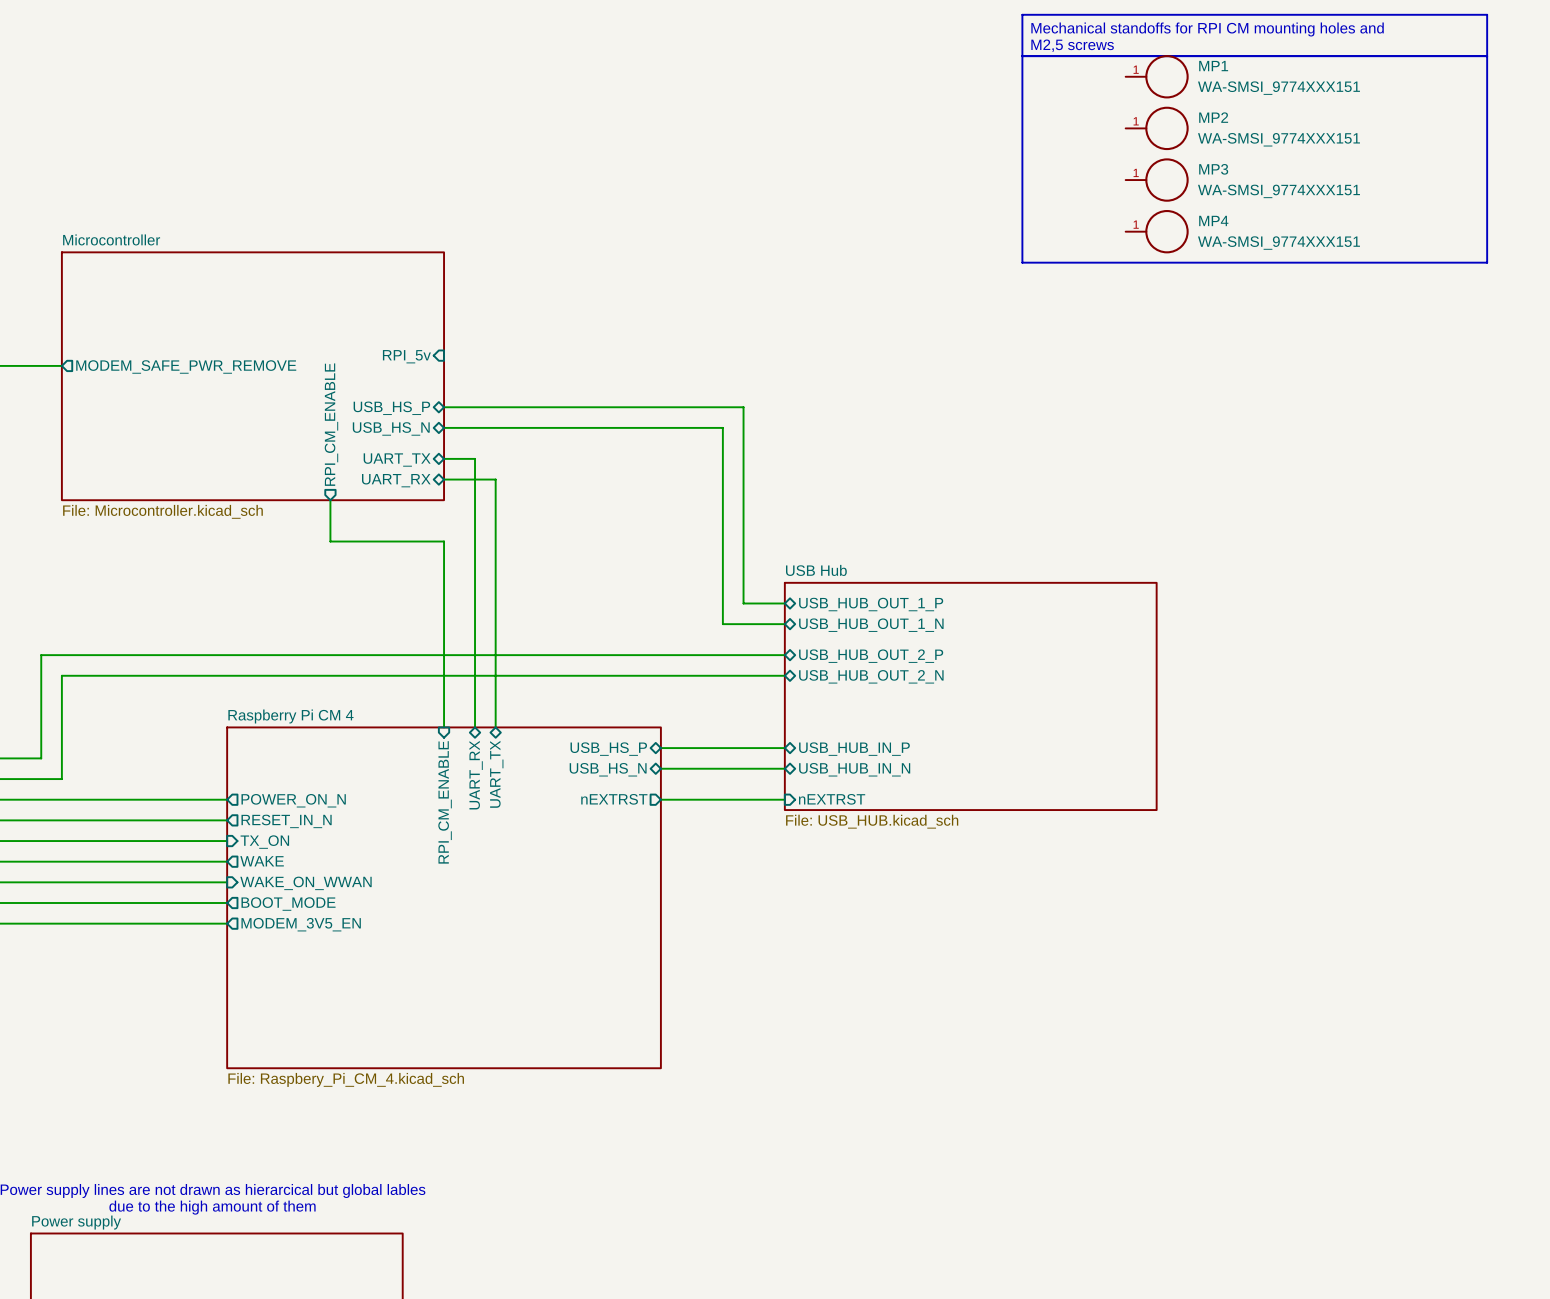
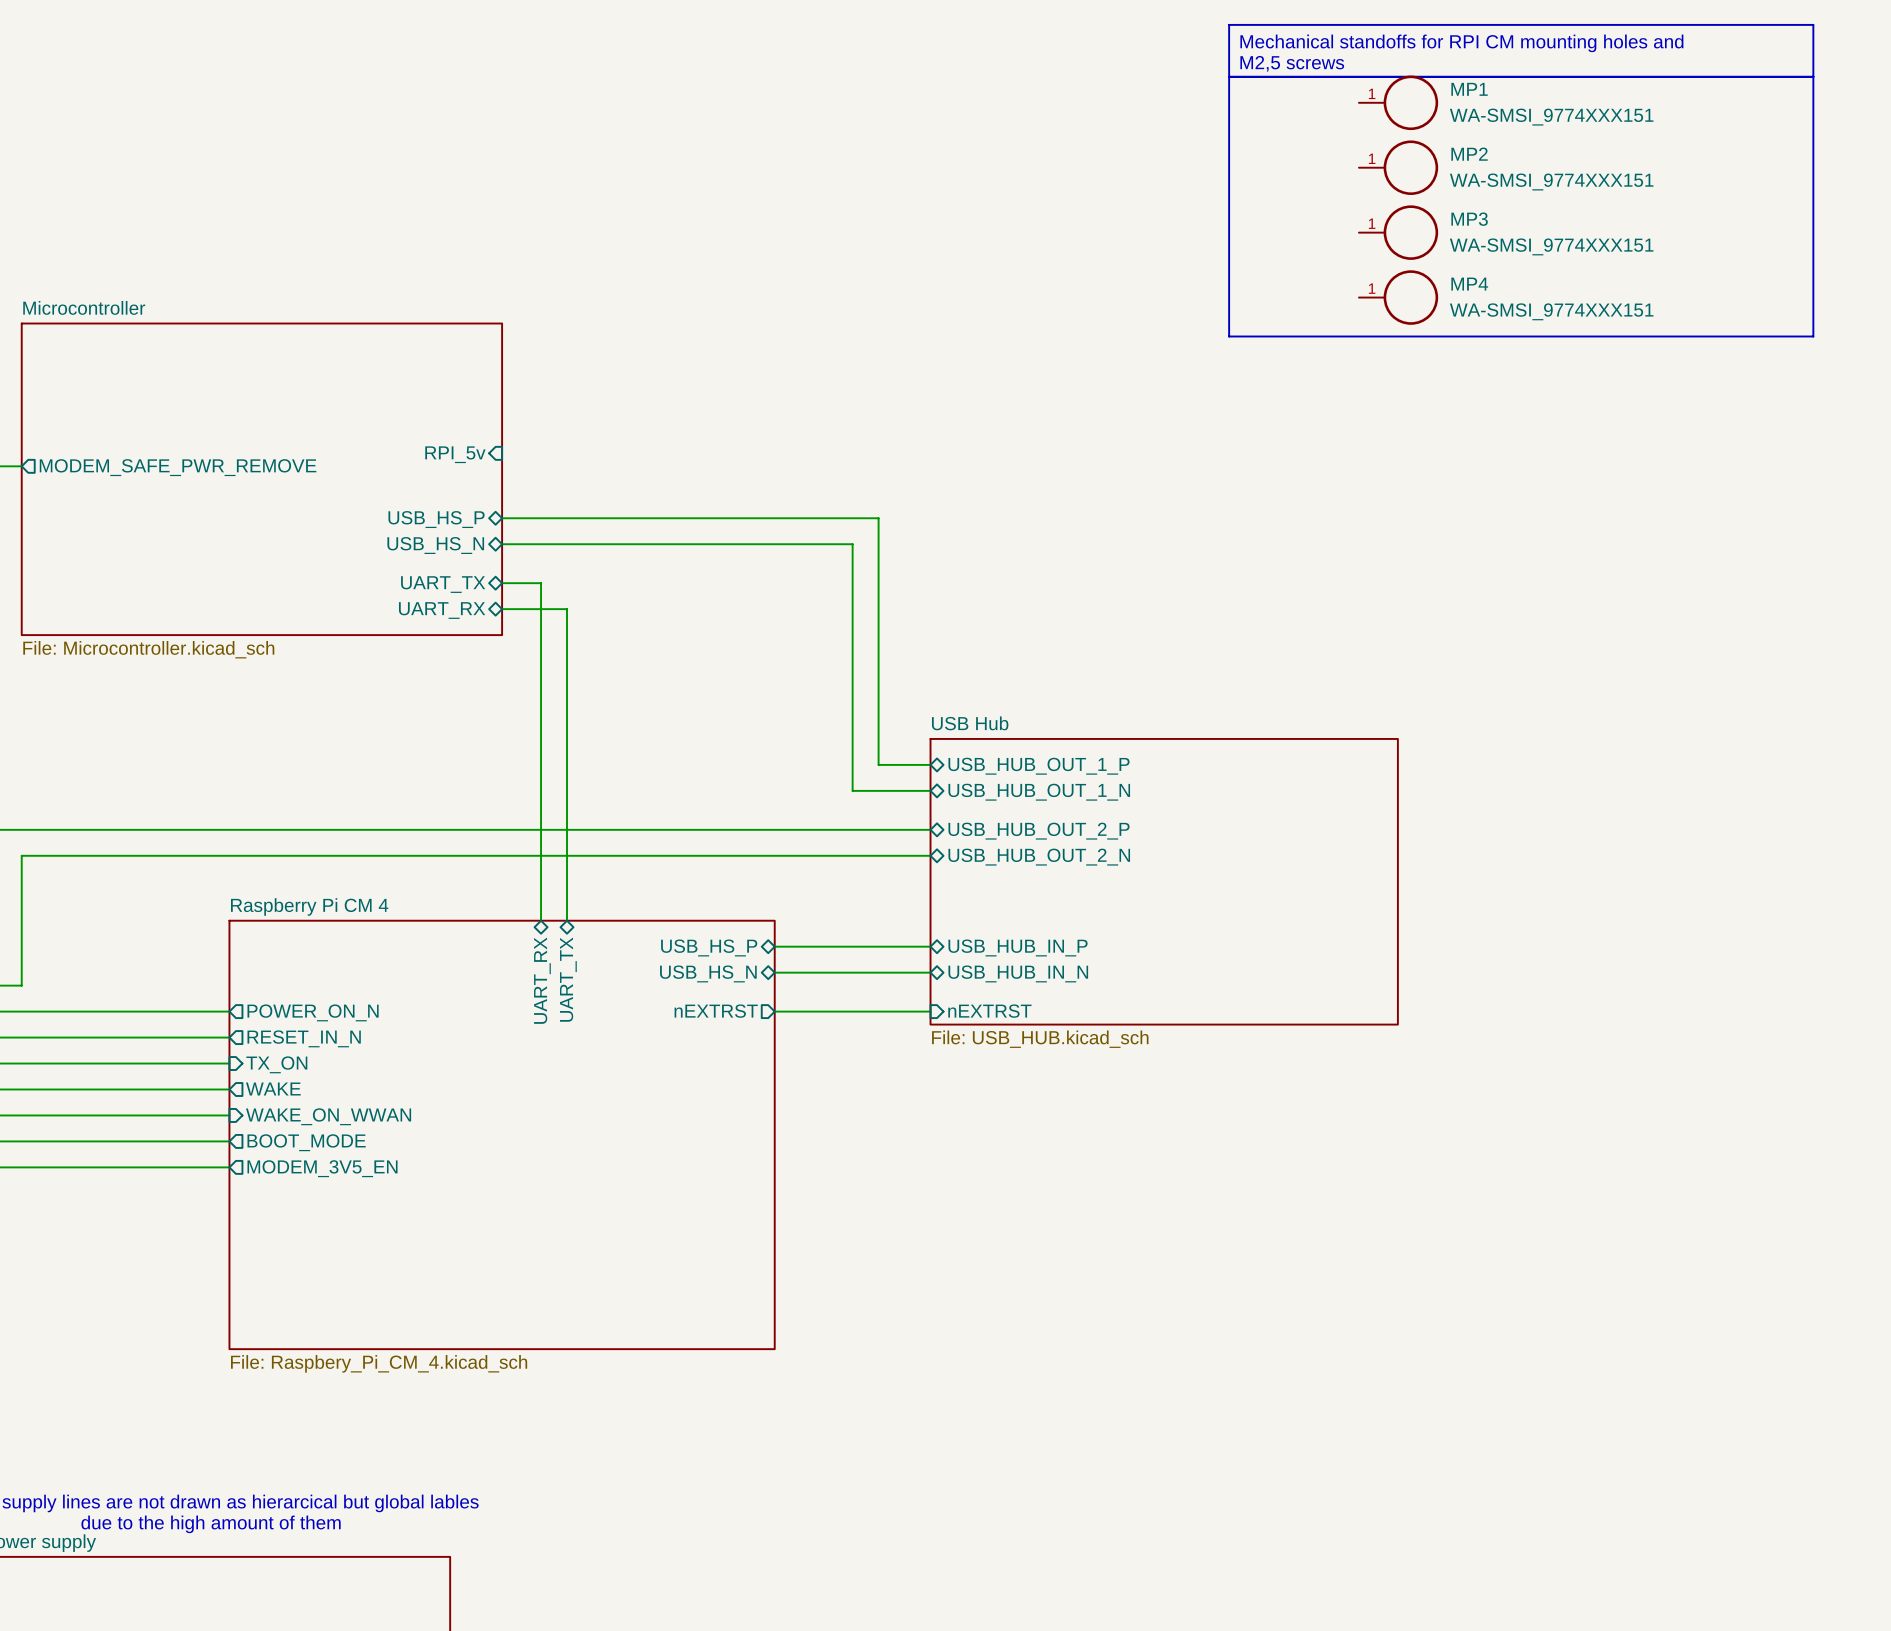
sheet pin: RPI_CM_ENABLE (331, 424) -> none
wire: (330, 500) (330, 541) (444, 541) (444, 727) -> none
sheet pin: RPI_CM_ENABLE (445, 802) -> none

